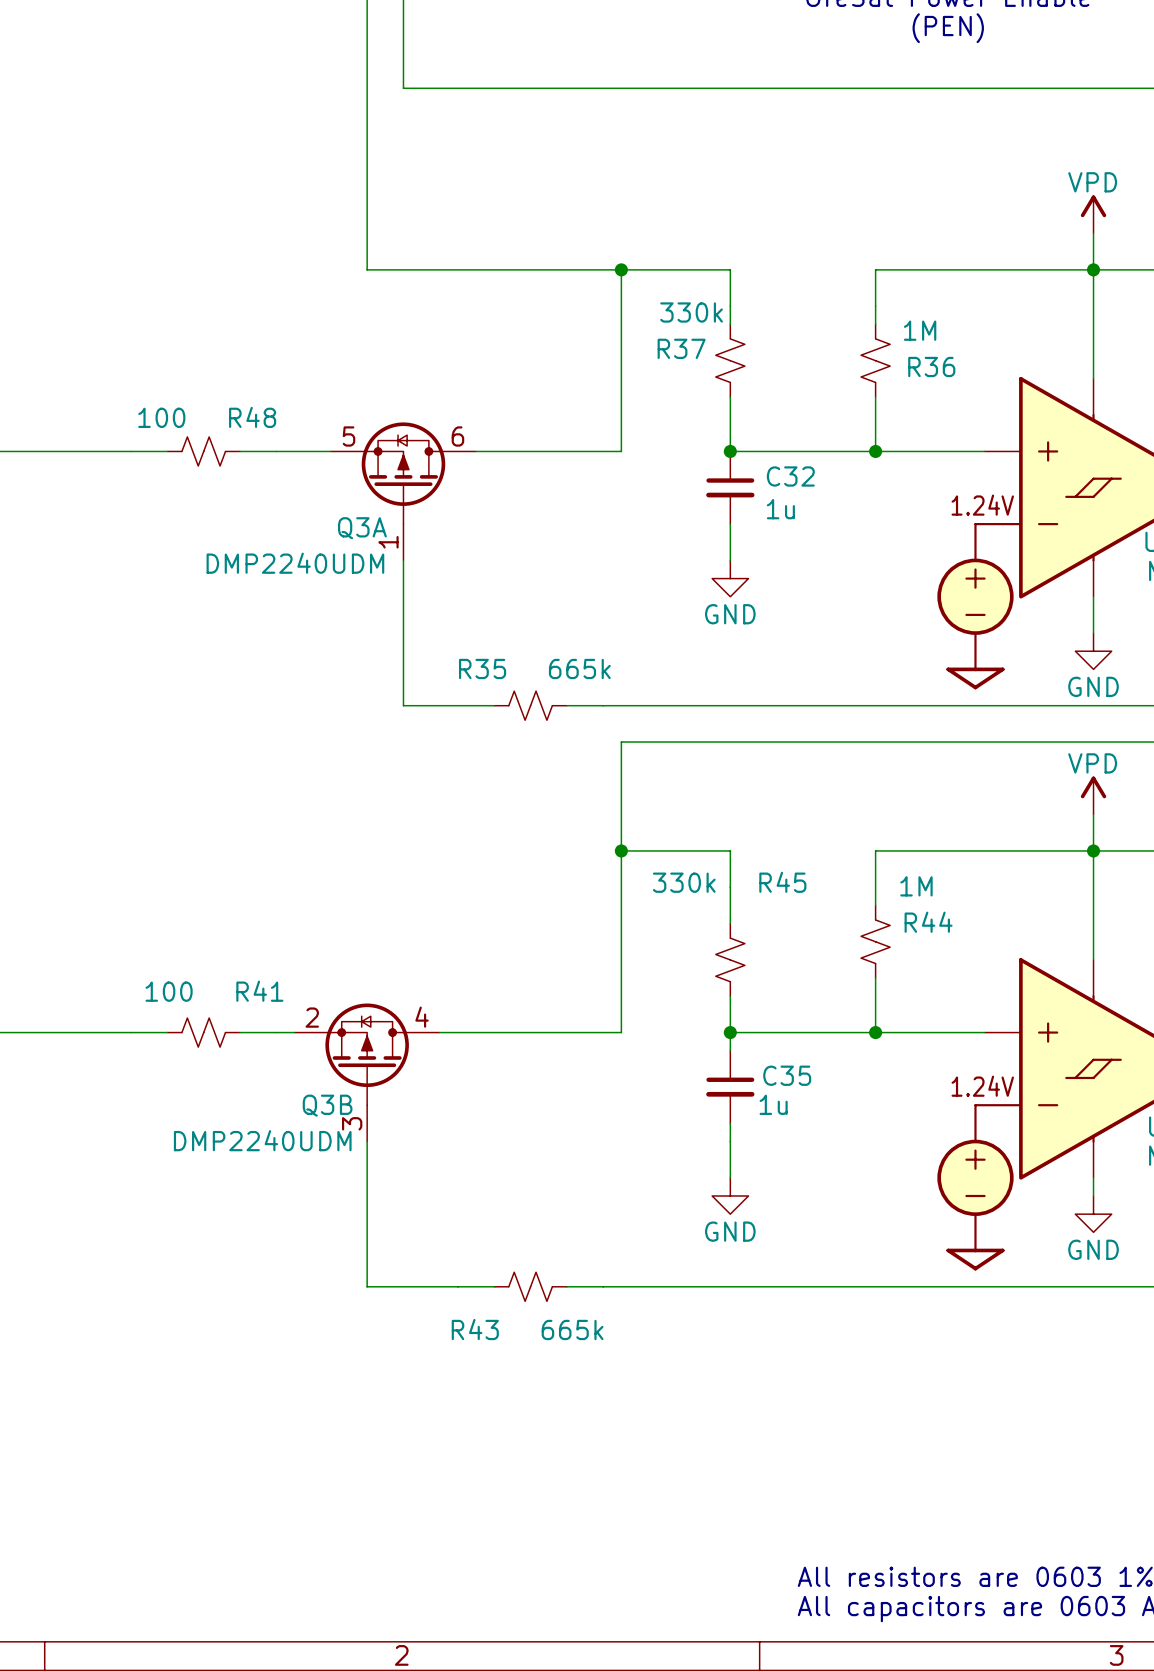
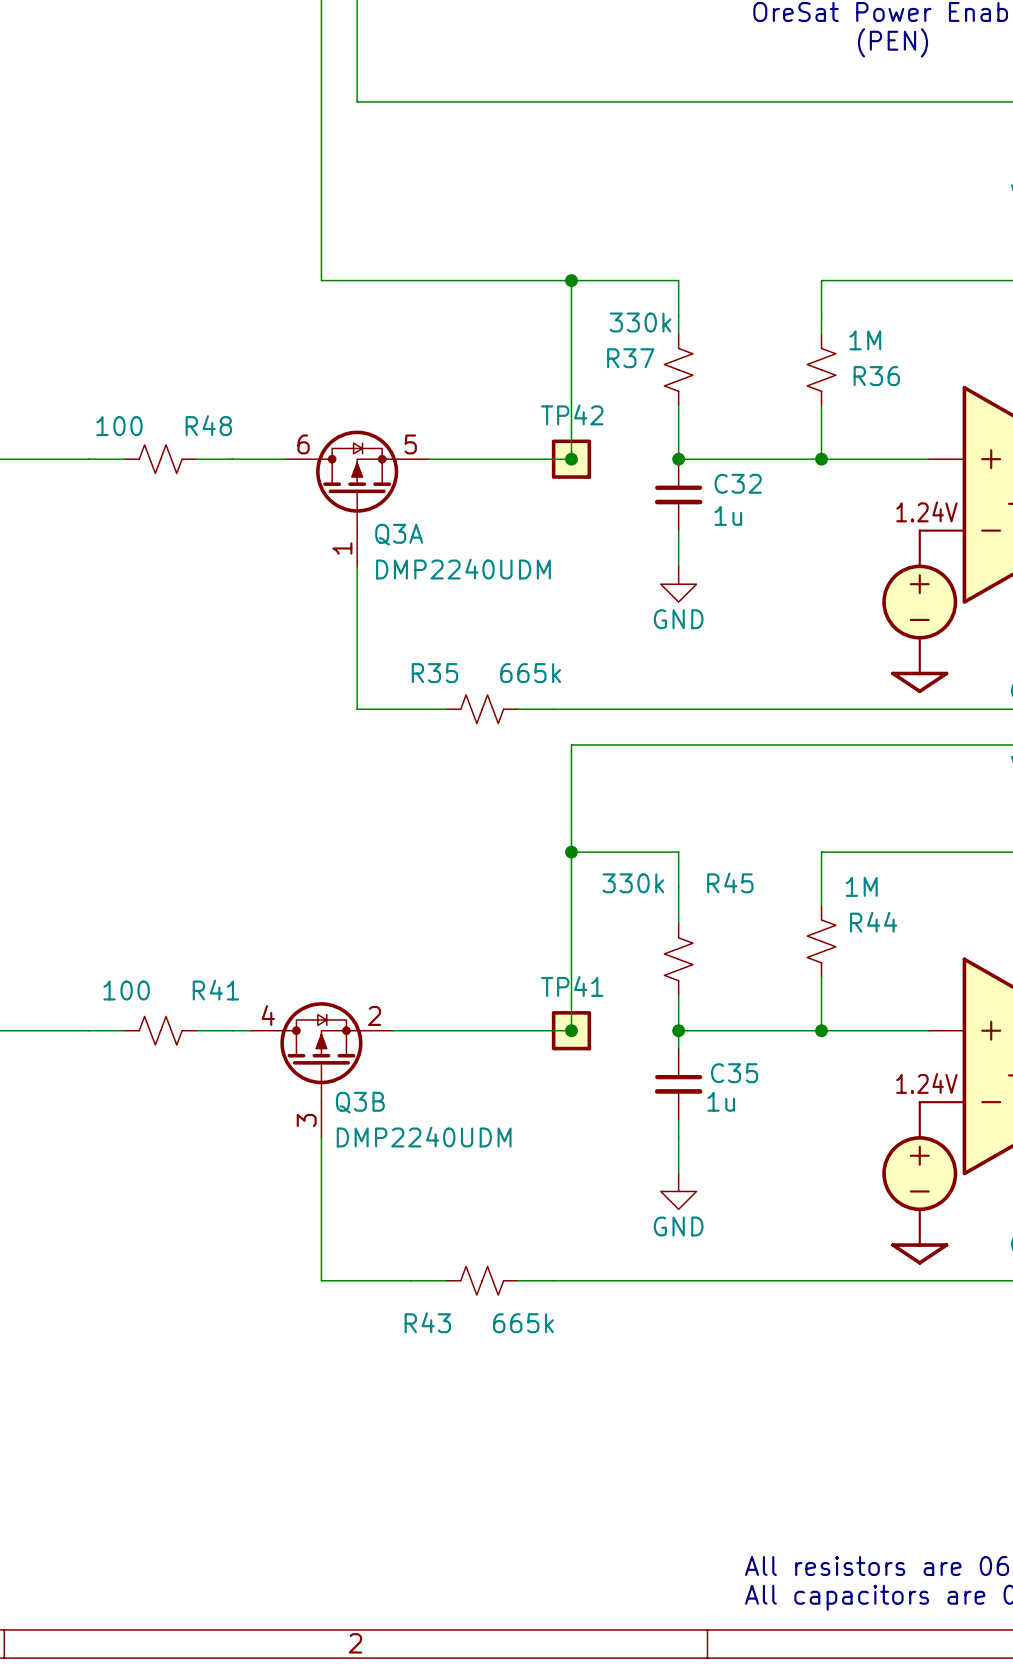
TP42: none -> (571, 459)
junction: none -> (571, 459)
Q3A flip: as is (403, 473) -> left-right (357, 480)
TP41: none -> (571, 1030)
junction: none -> (571, 1030)
Q3B flip: as is (367, 1054) -> left-right (321, 1052)

